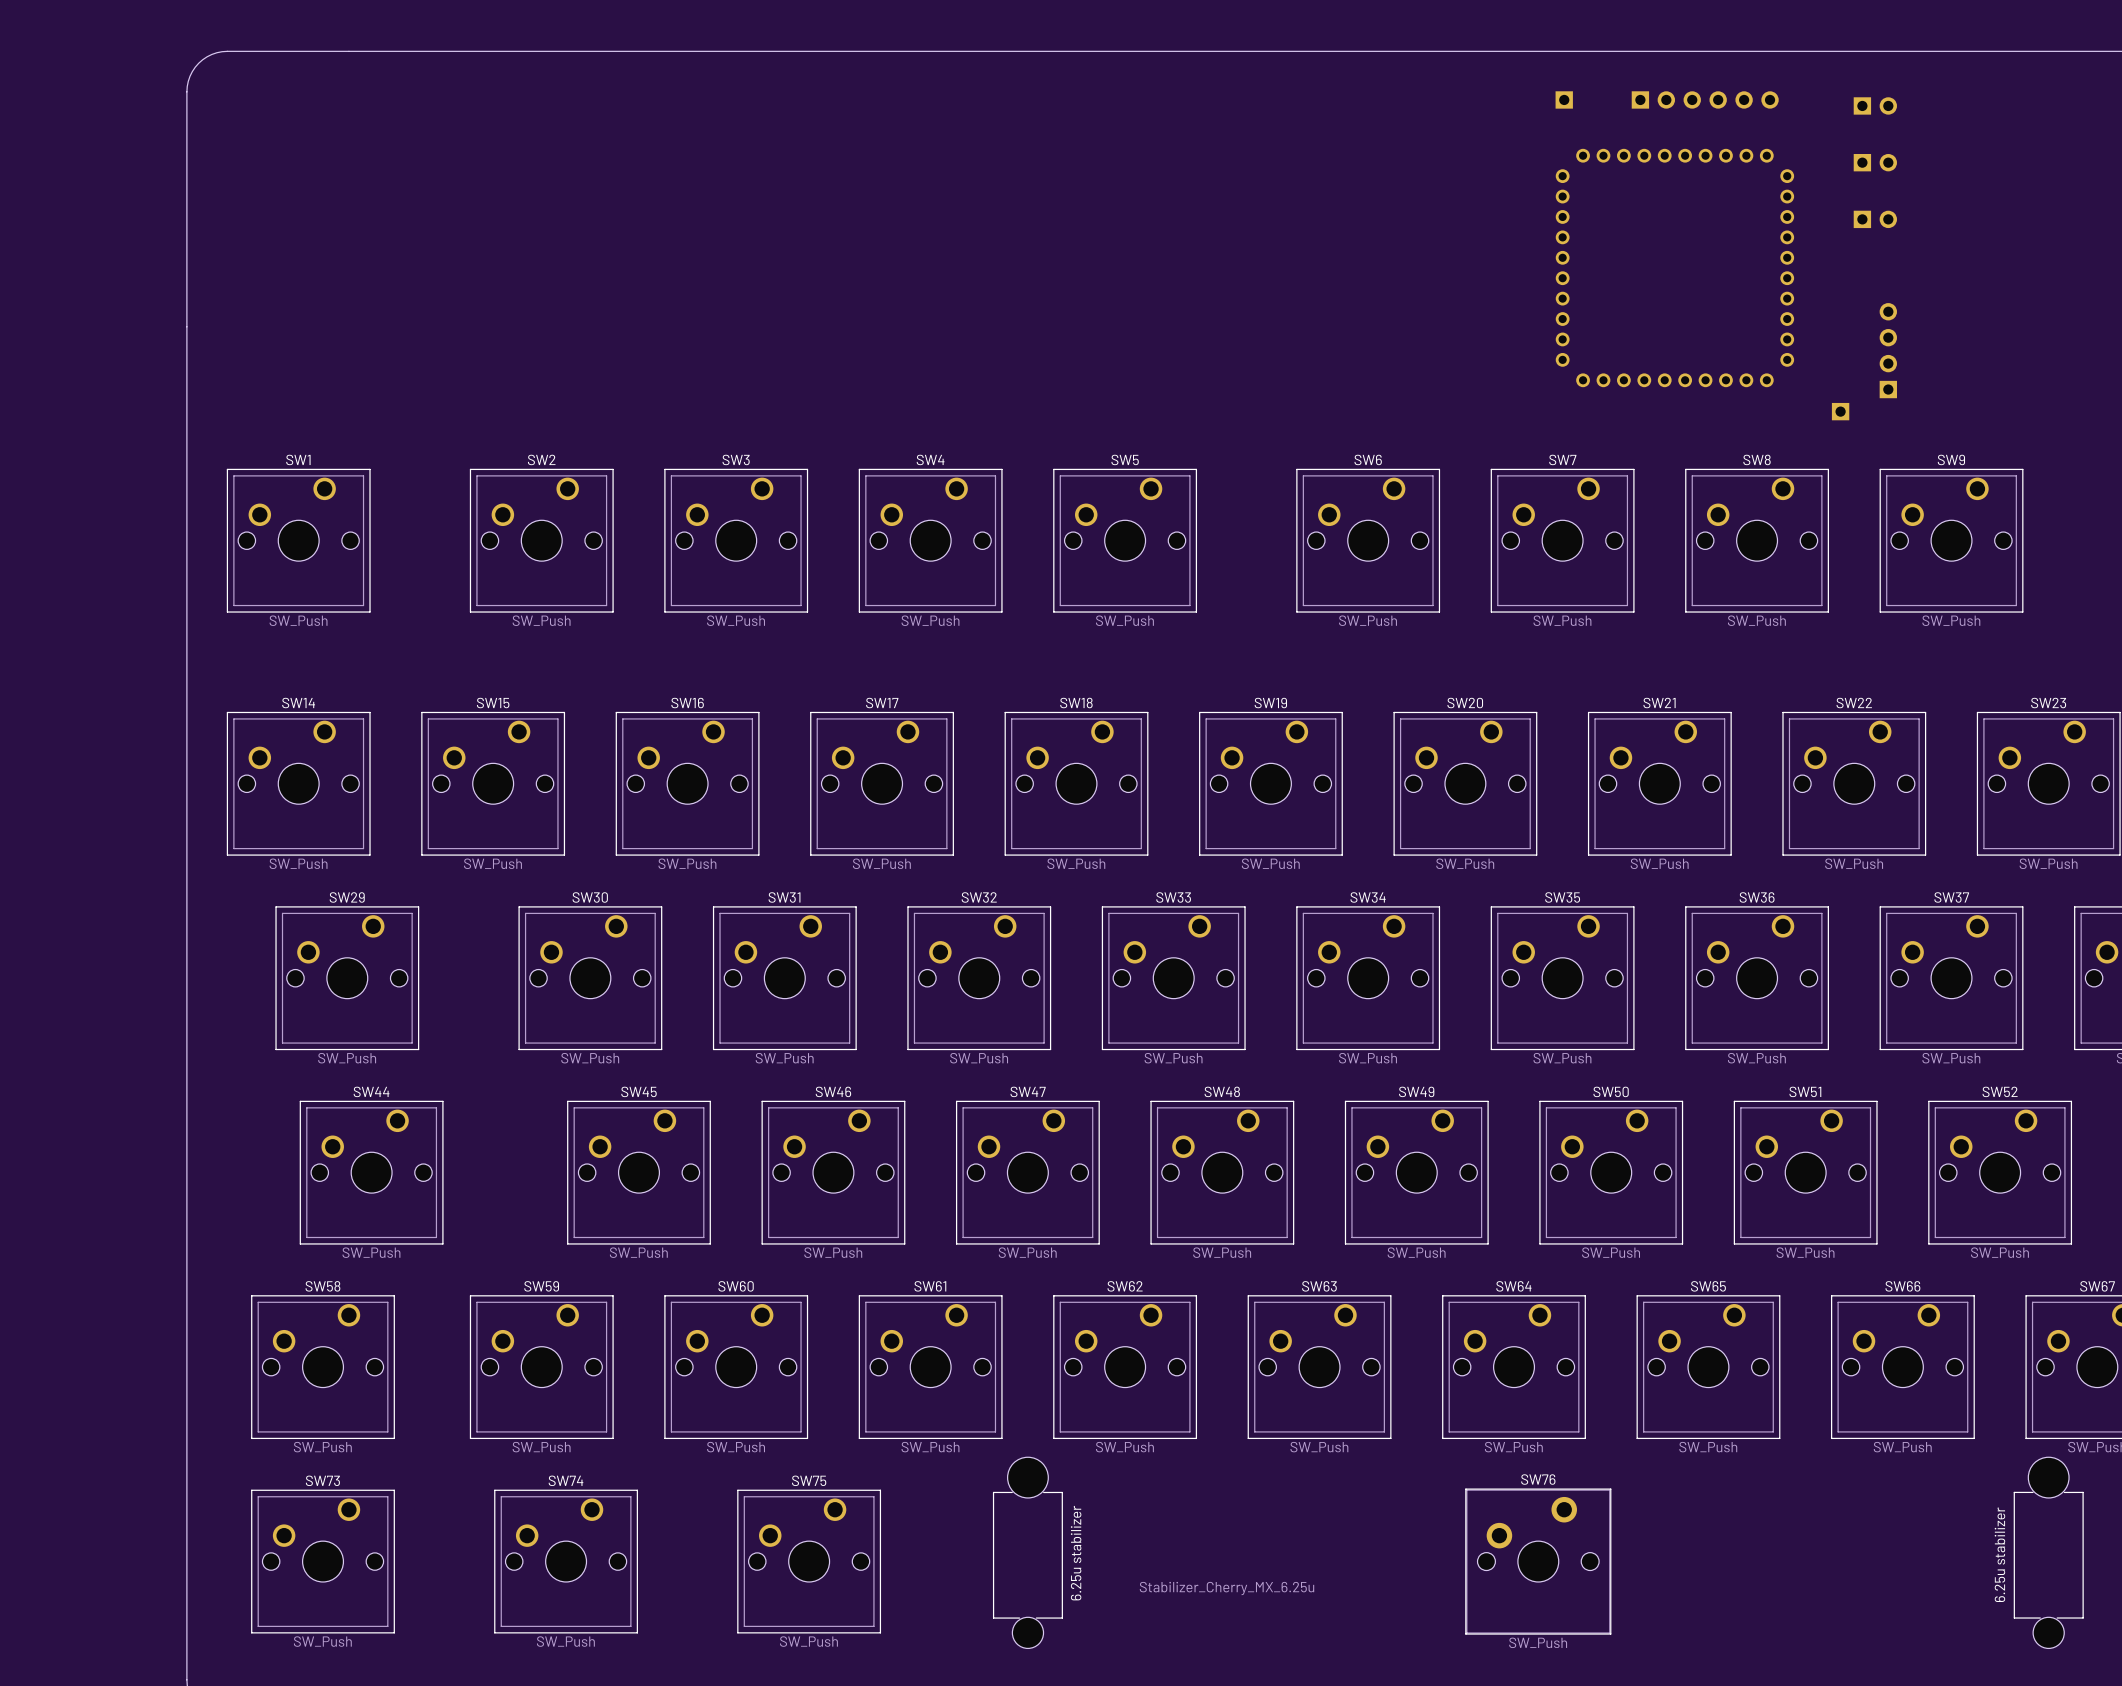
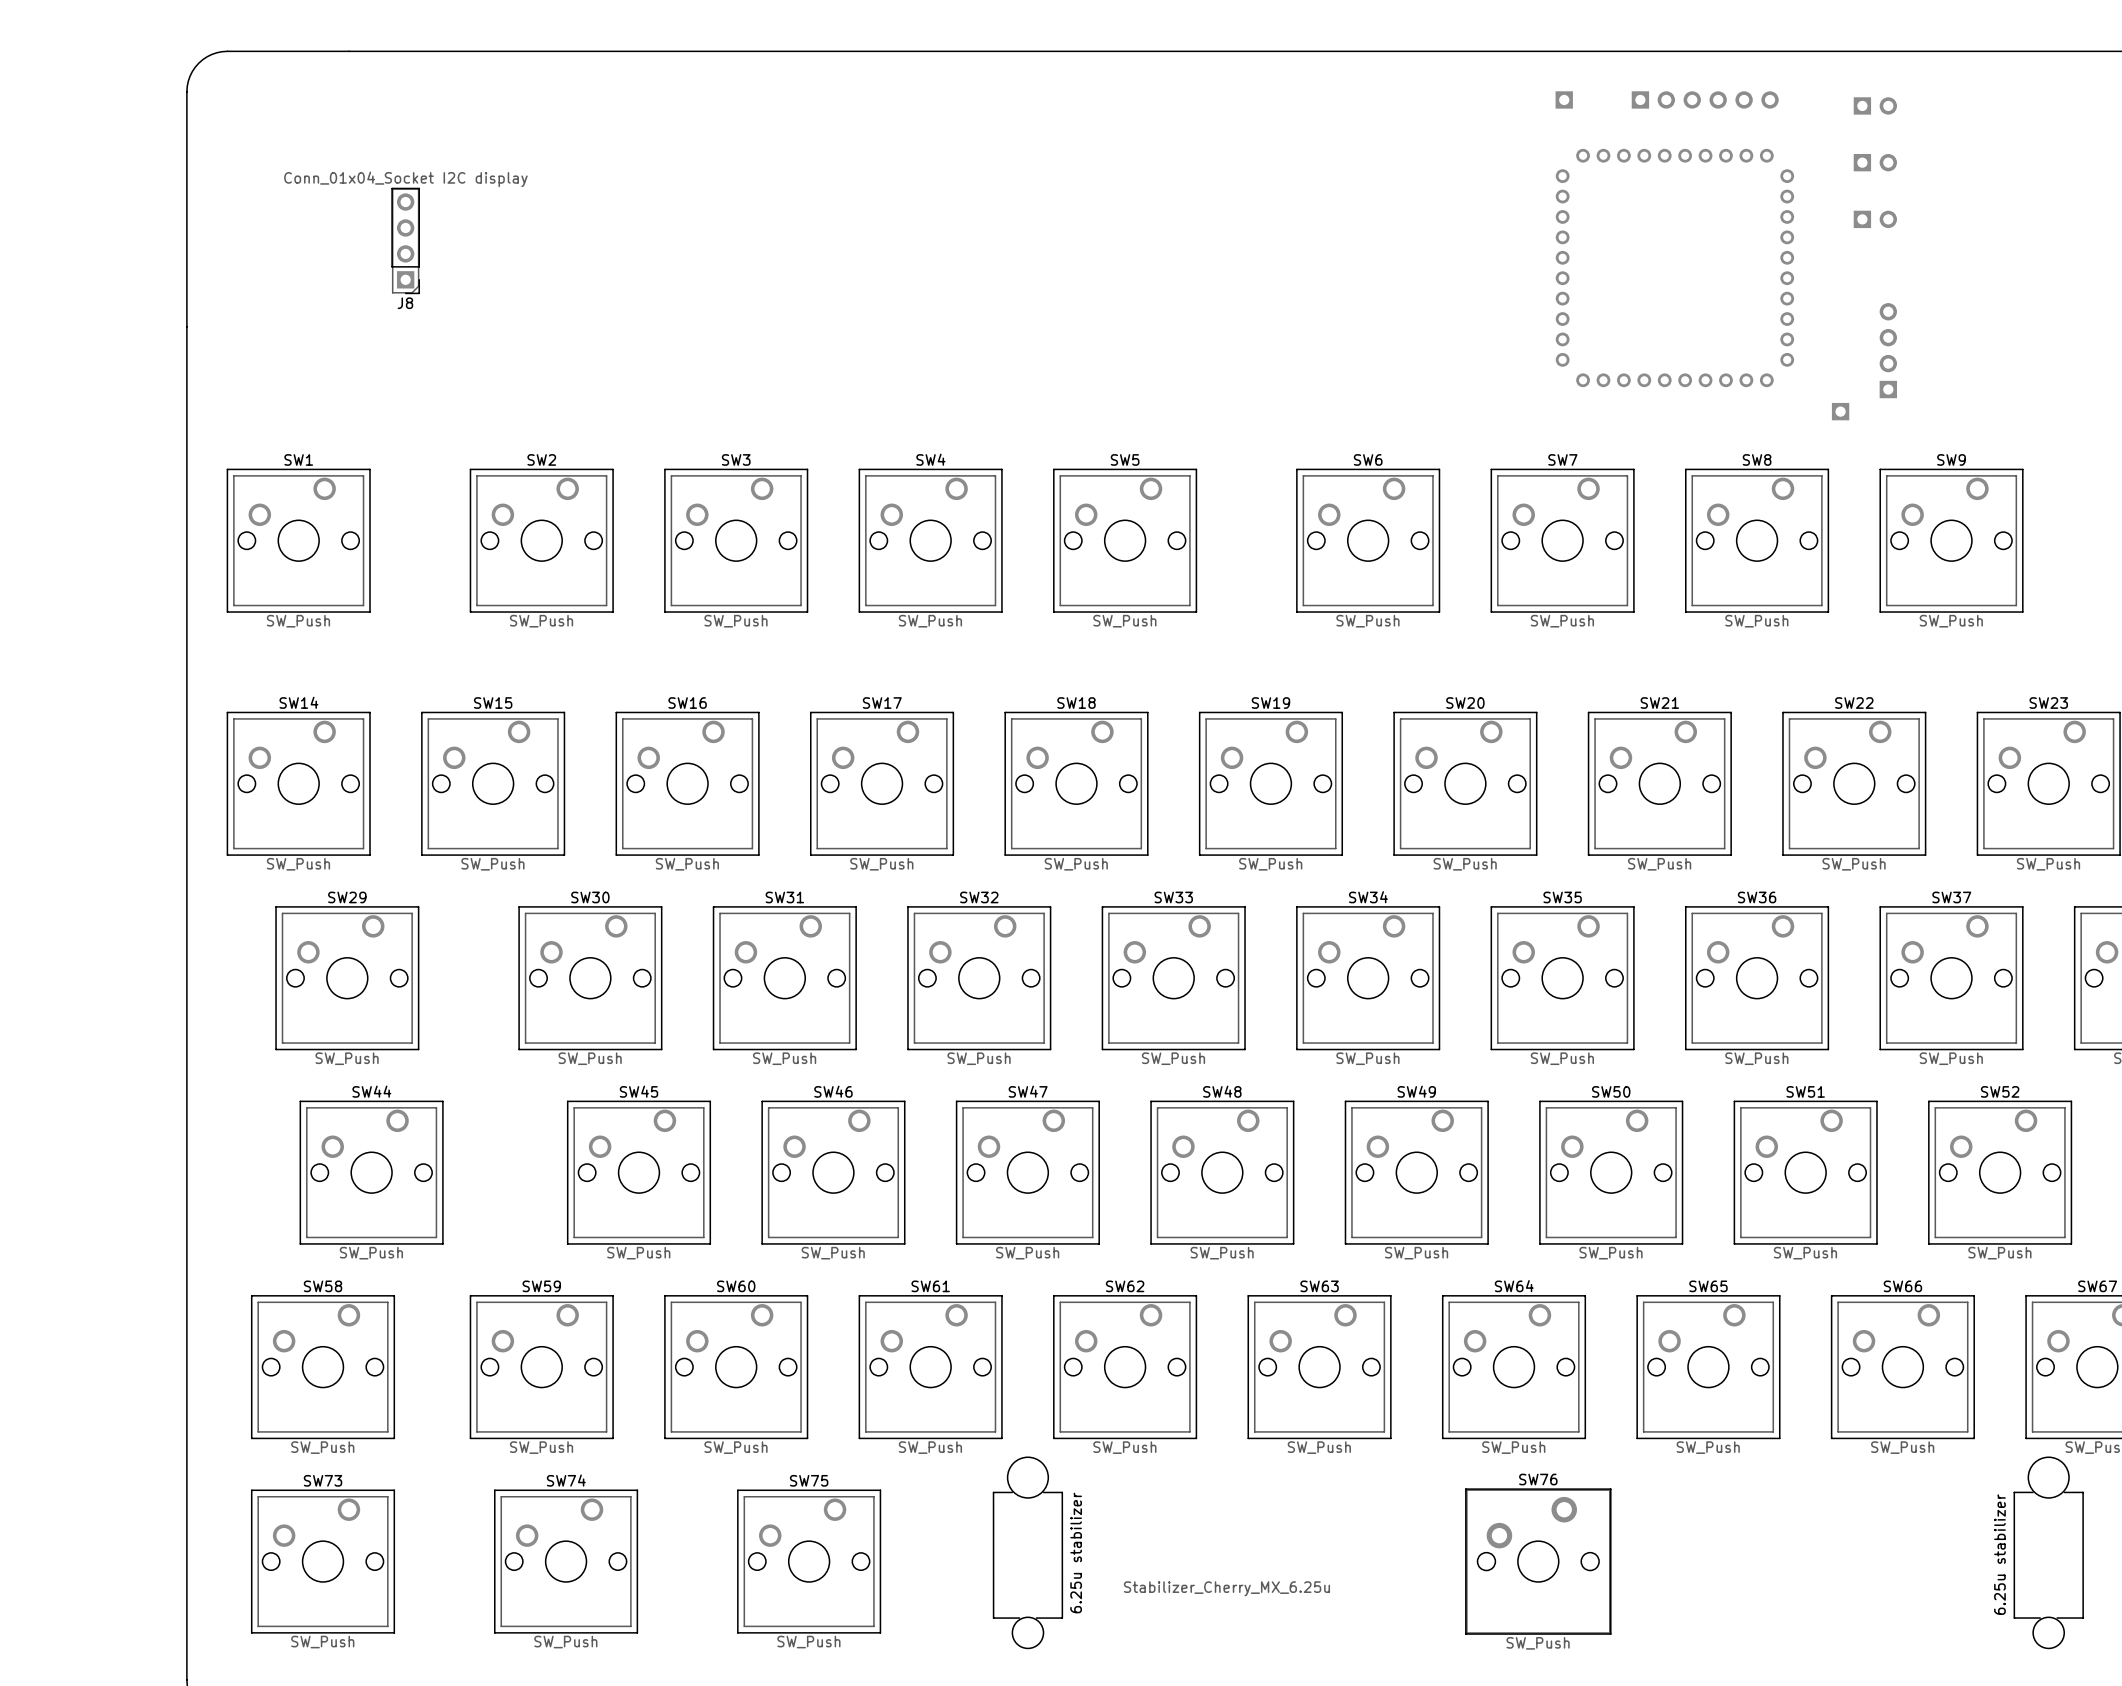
J8: none -> Conn_01x04_Socket I2C display (405, 240)

